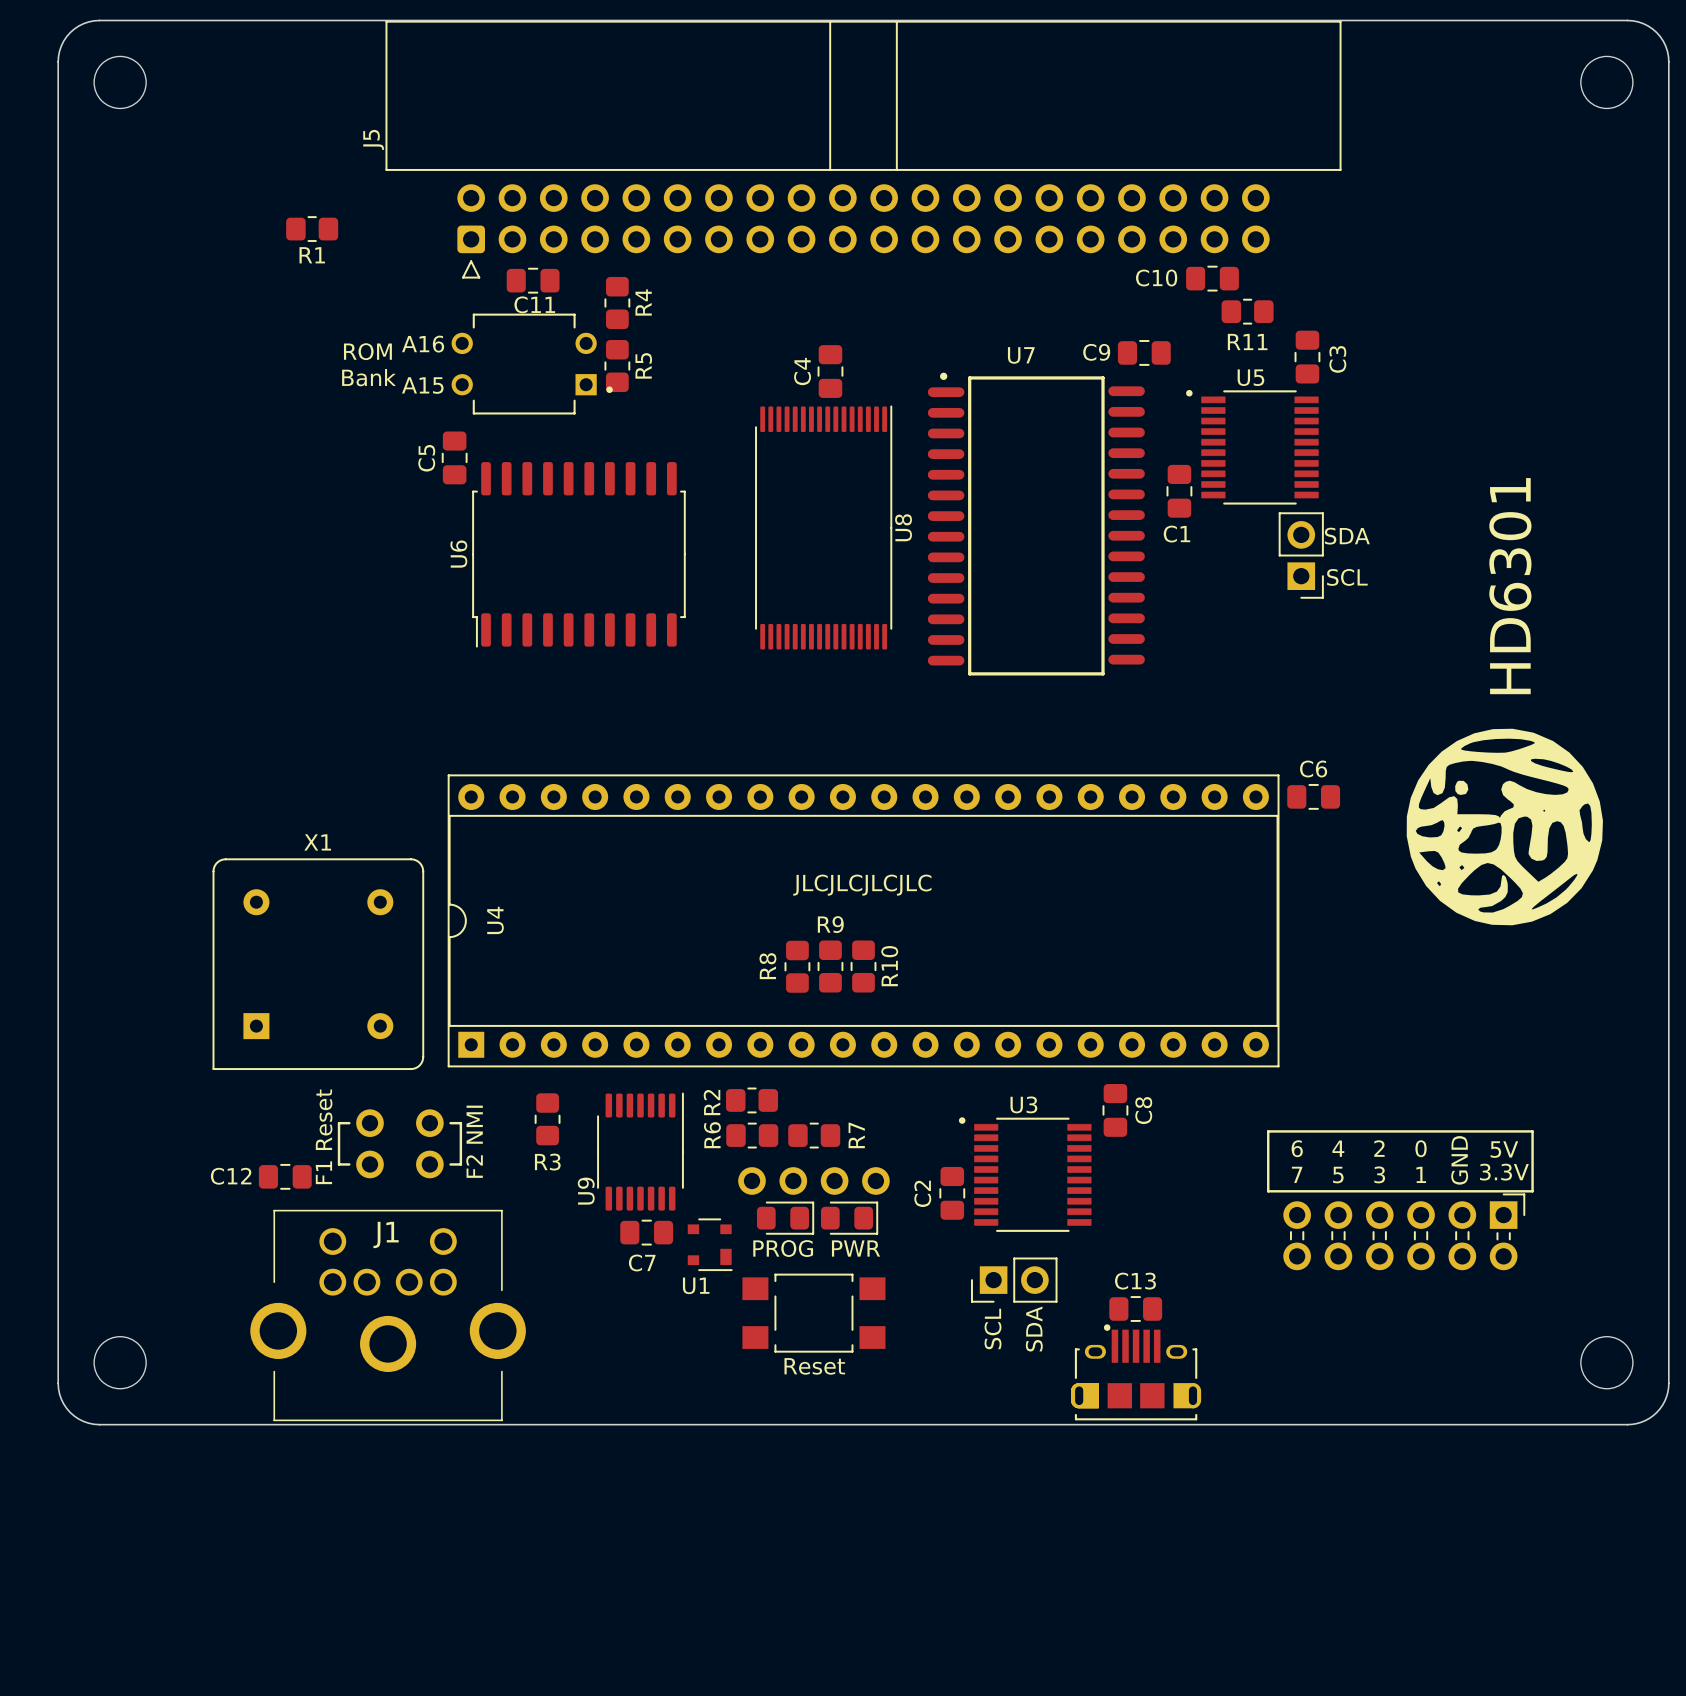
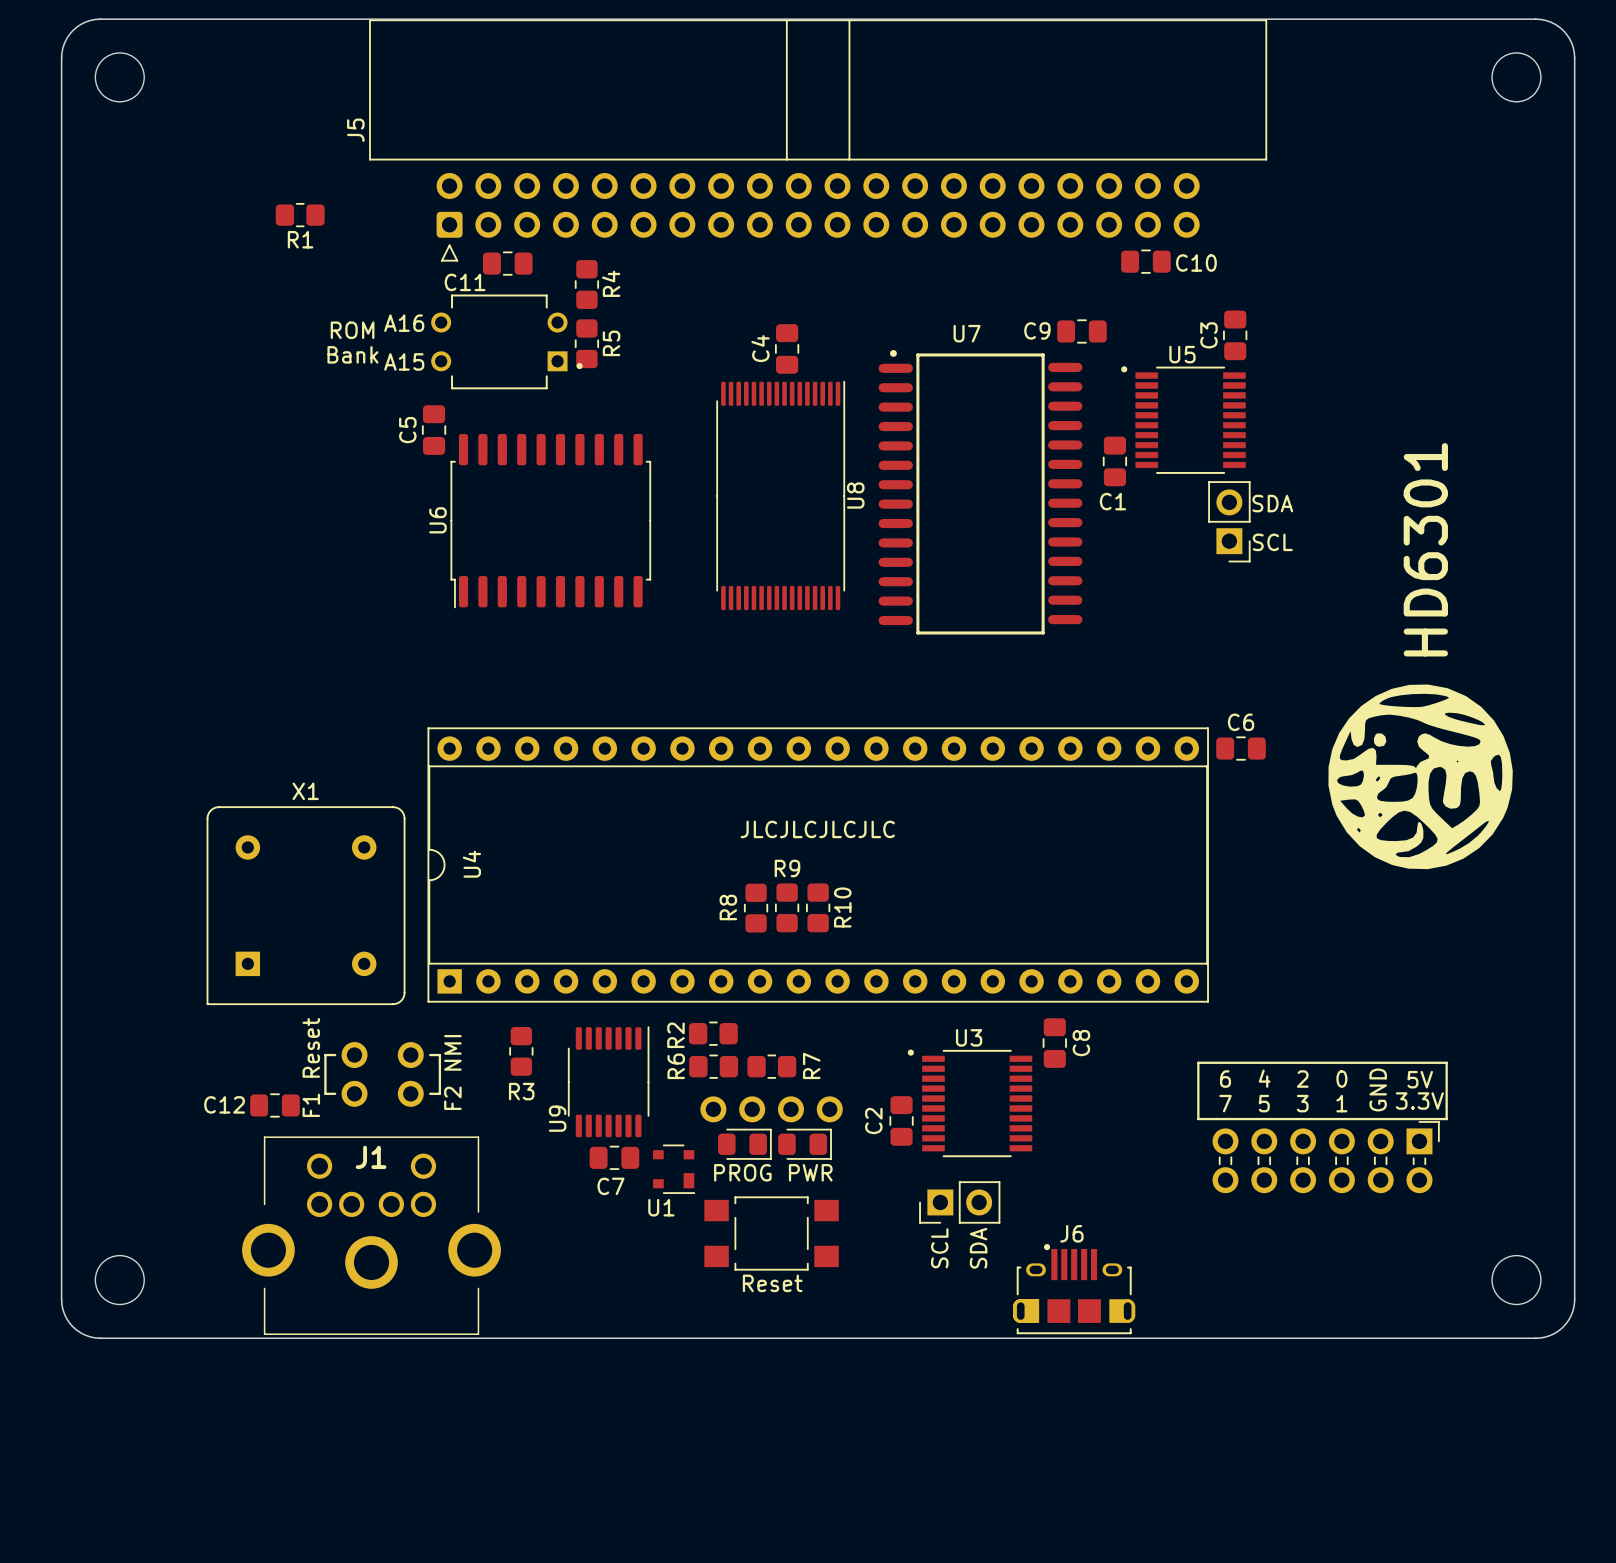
C10 name position: C10 (1156, 278) -> C10 (1196, 263)
C11 name position: C11 (534, 304) -> C11 (465, 282)
R11: (1247, 311) -> none
C3 name position: C3 (1337, 359) -> C3 (1208, 335)
C13: (1135, 1309) -> none
J6 name: none -> J6 (1071, 1233)

